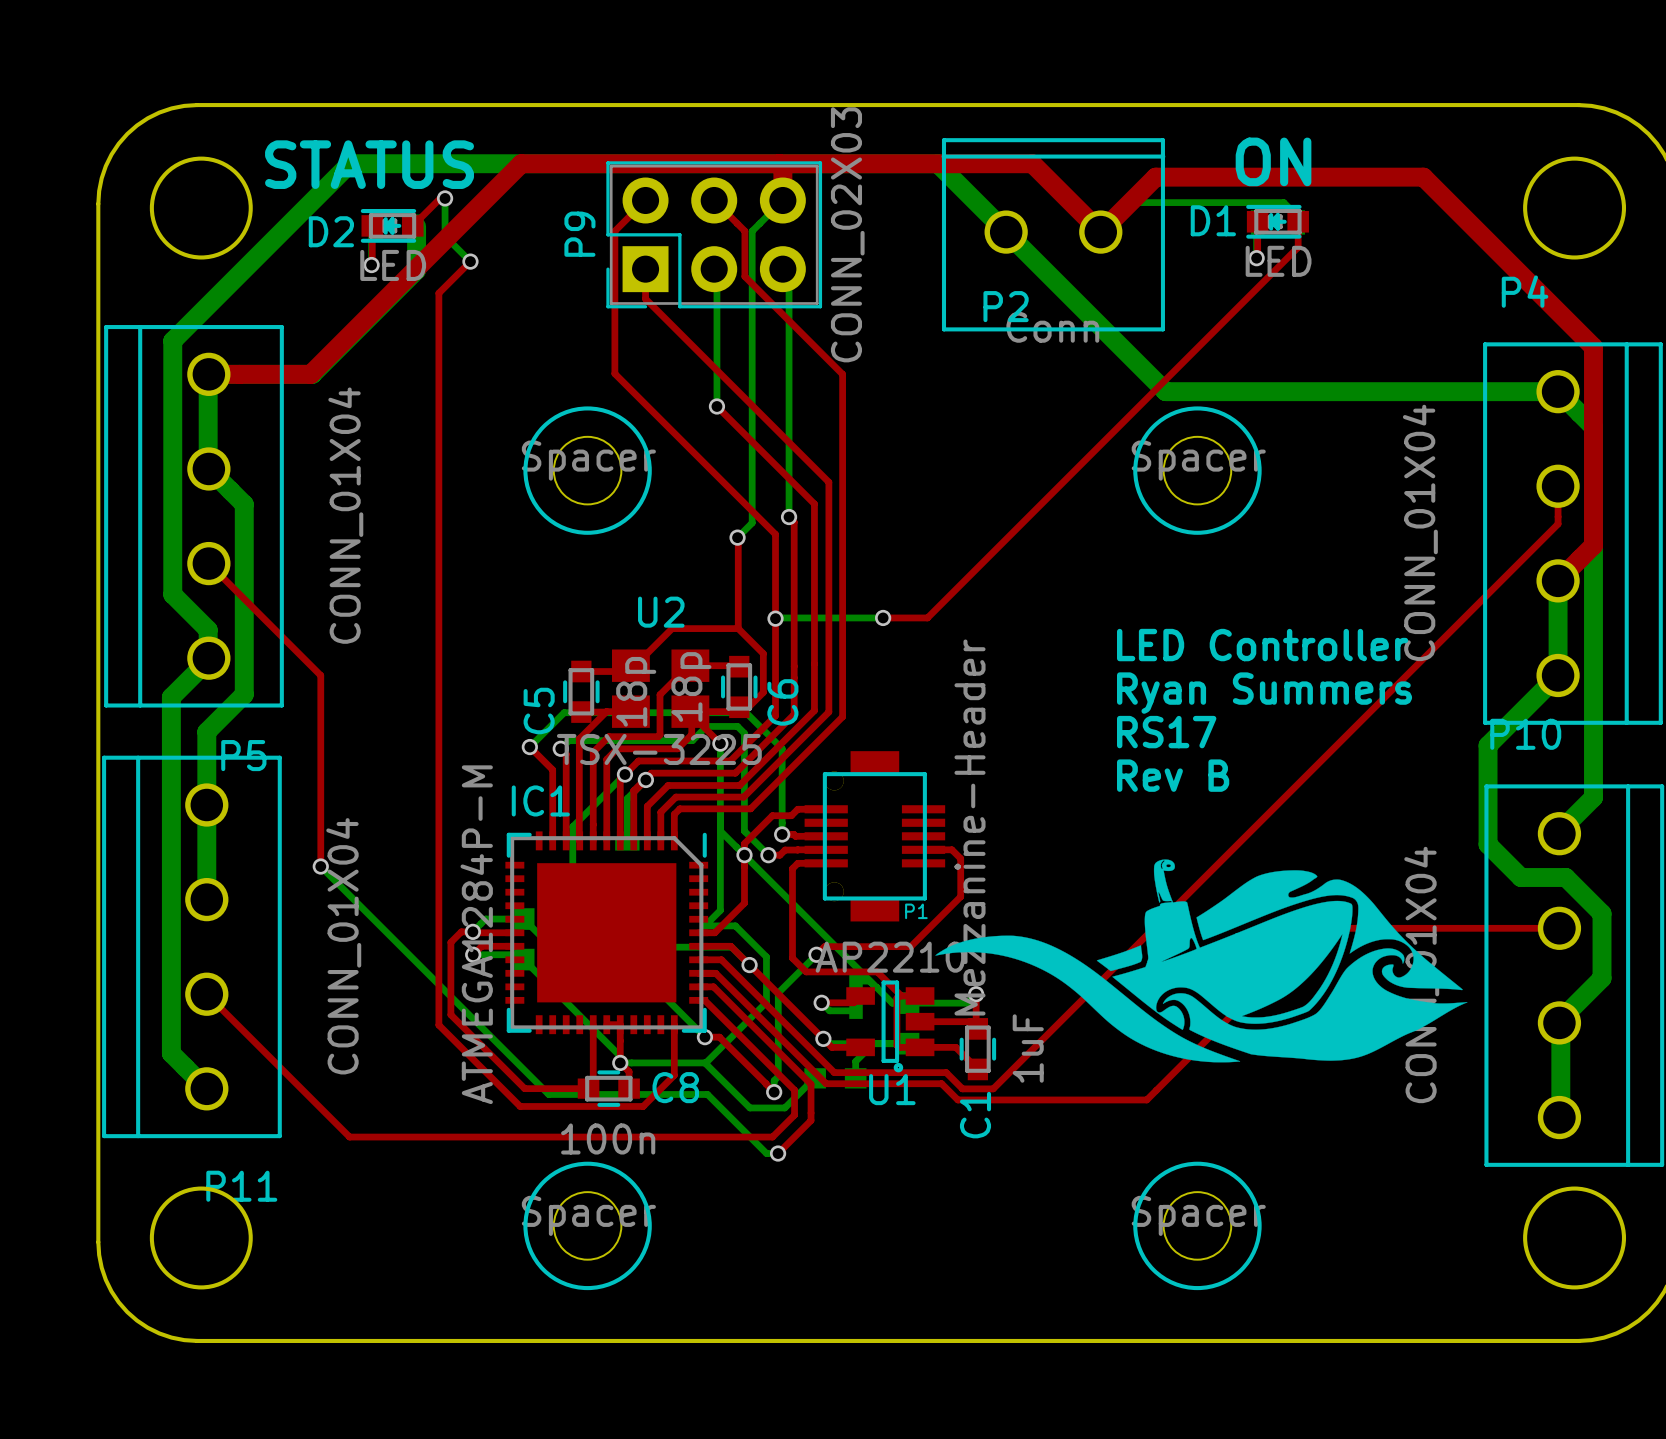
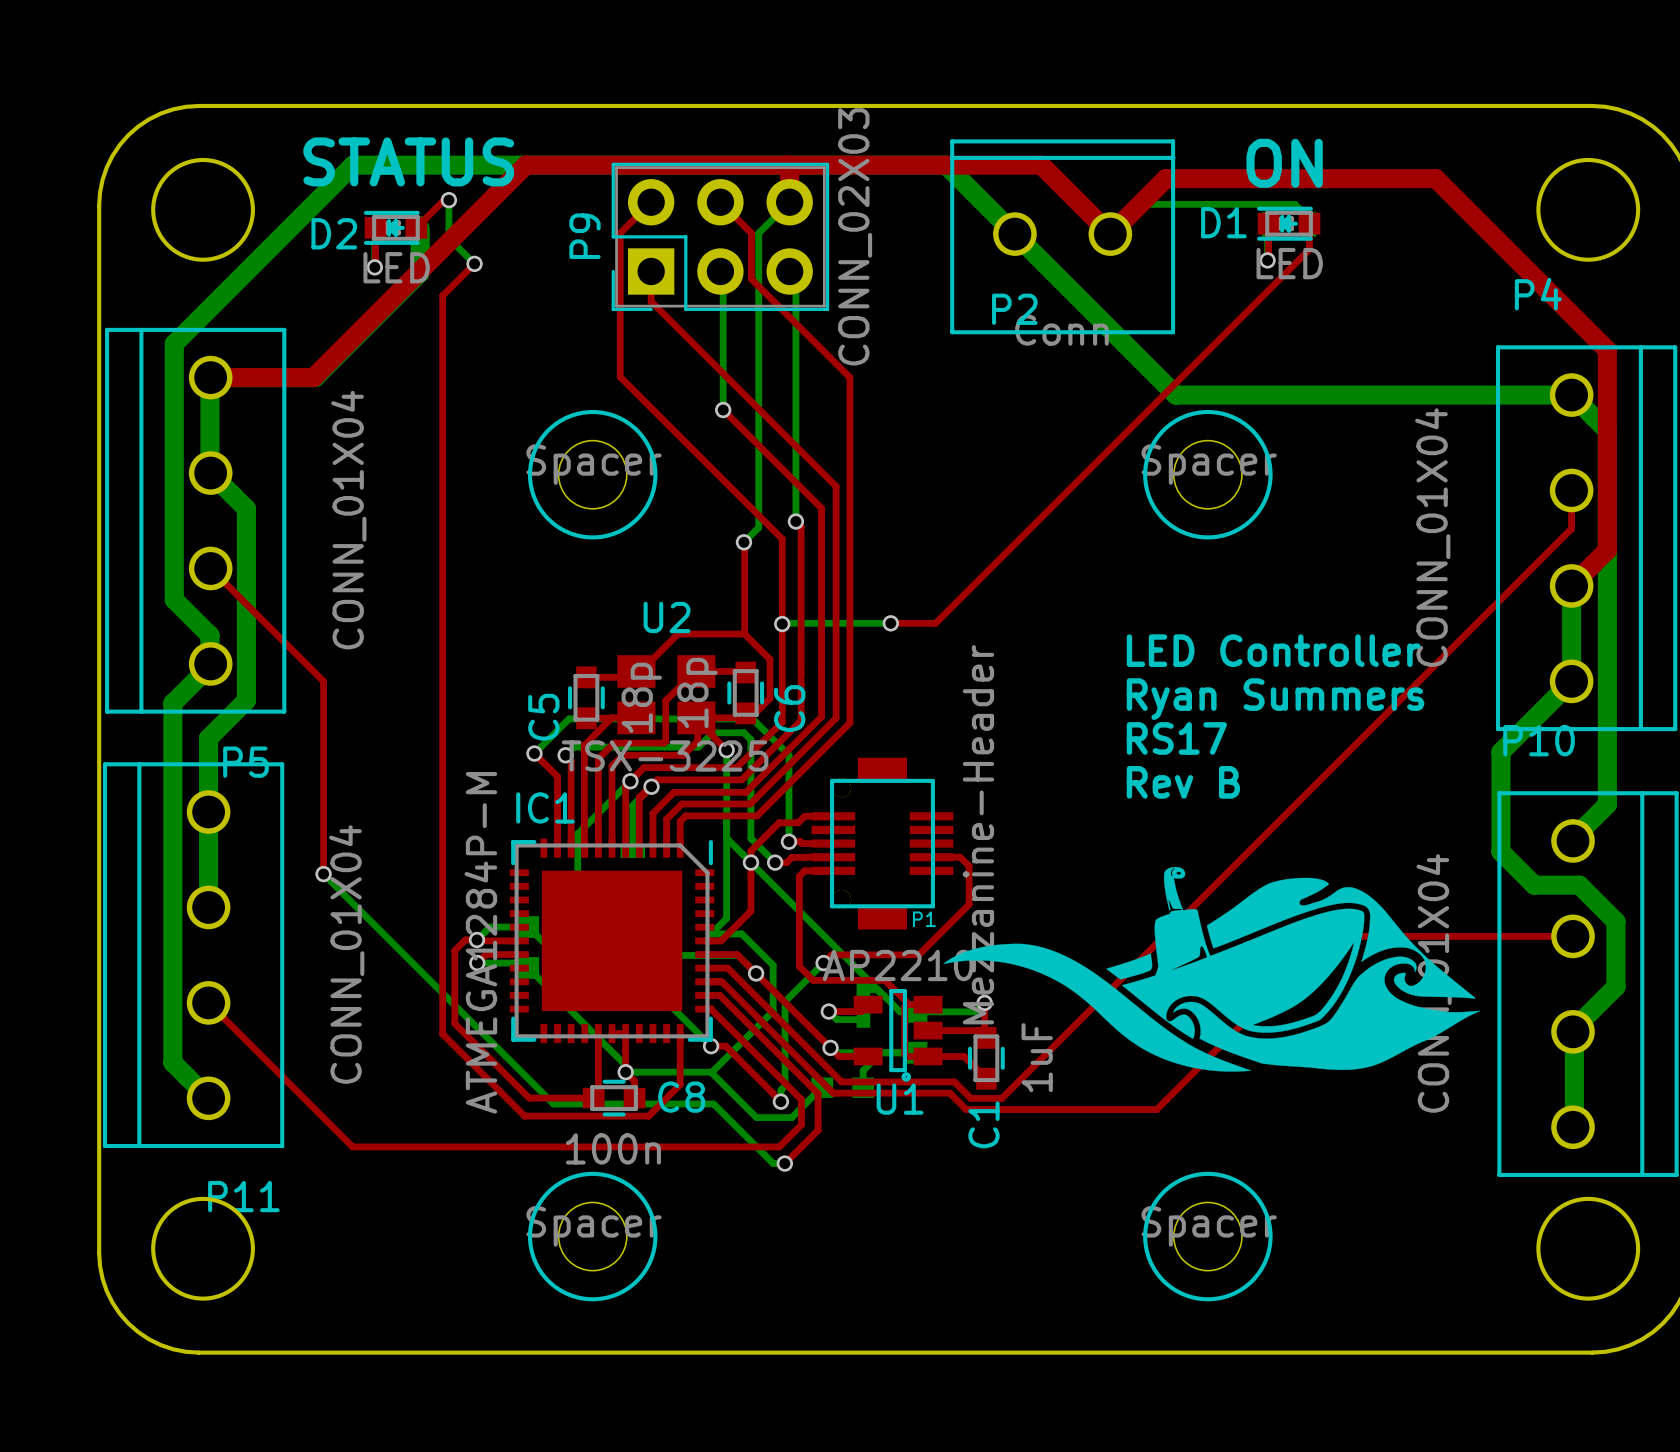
text position: STATUS (369, 164) -> STATUS (408, 161)

